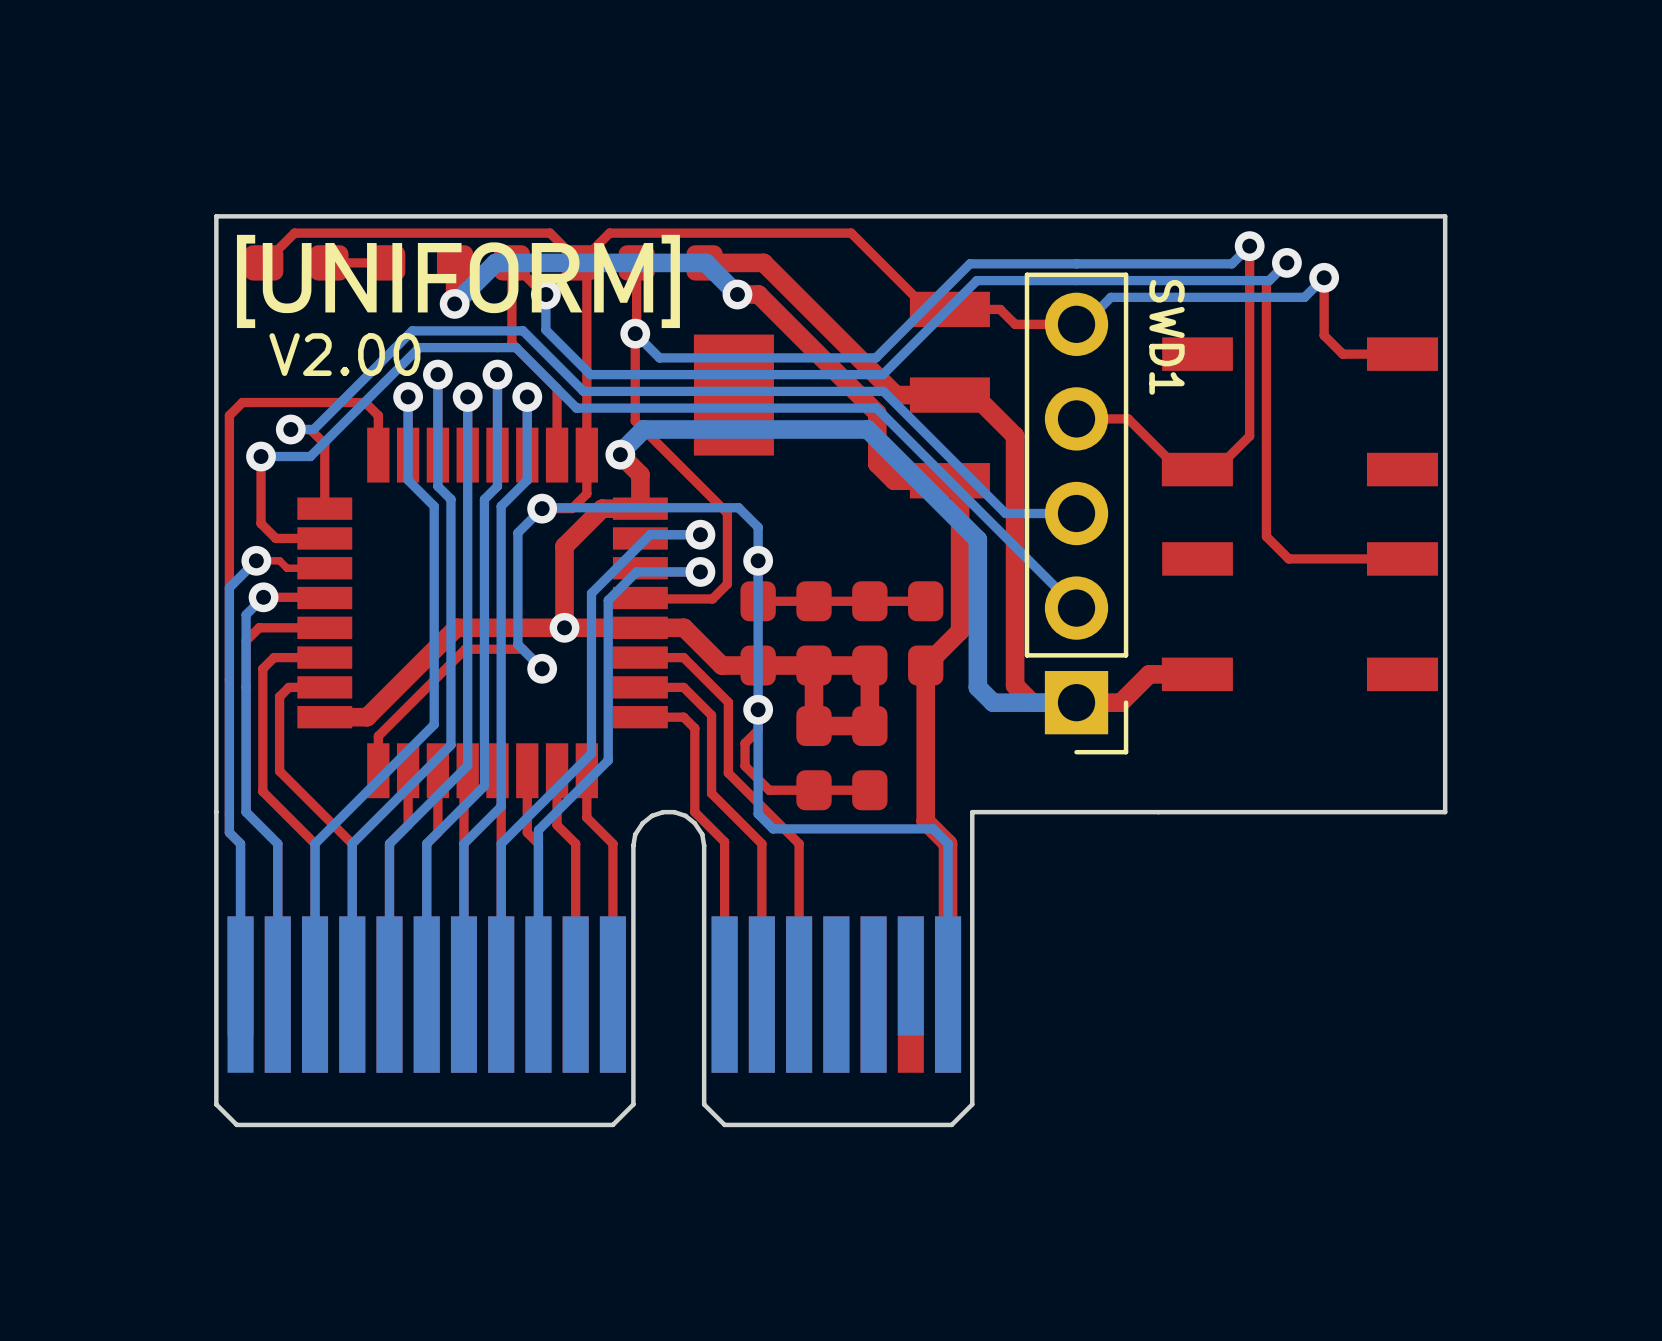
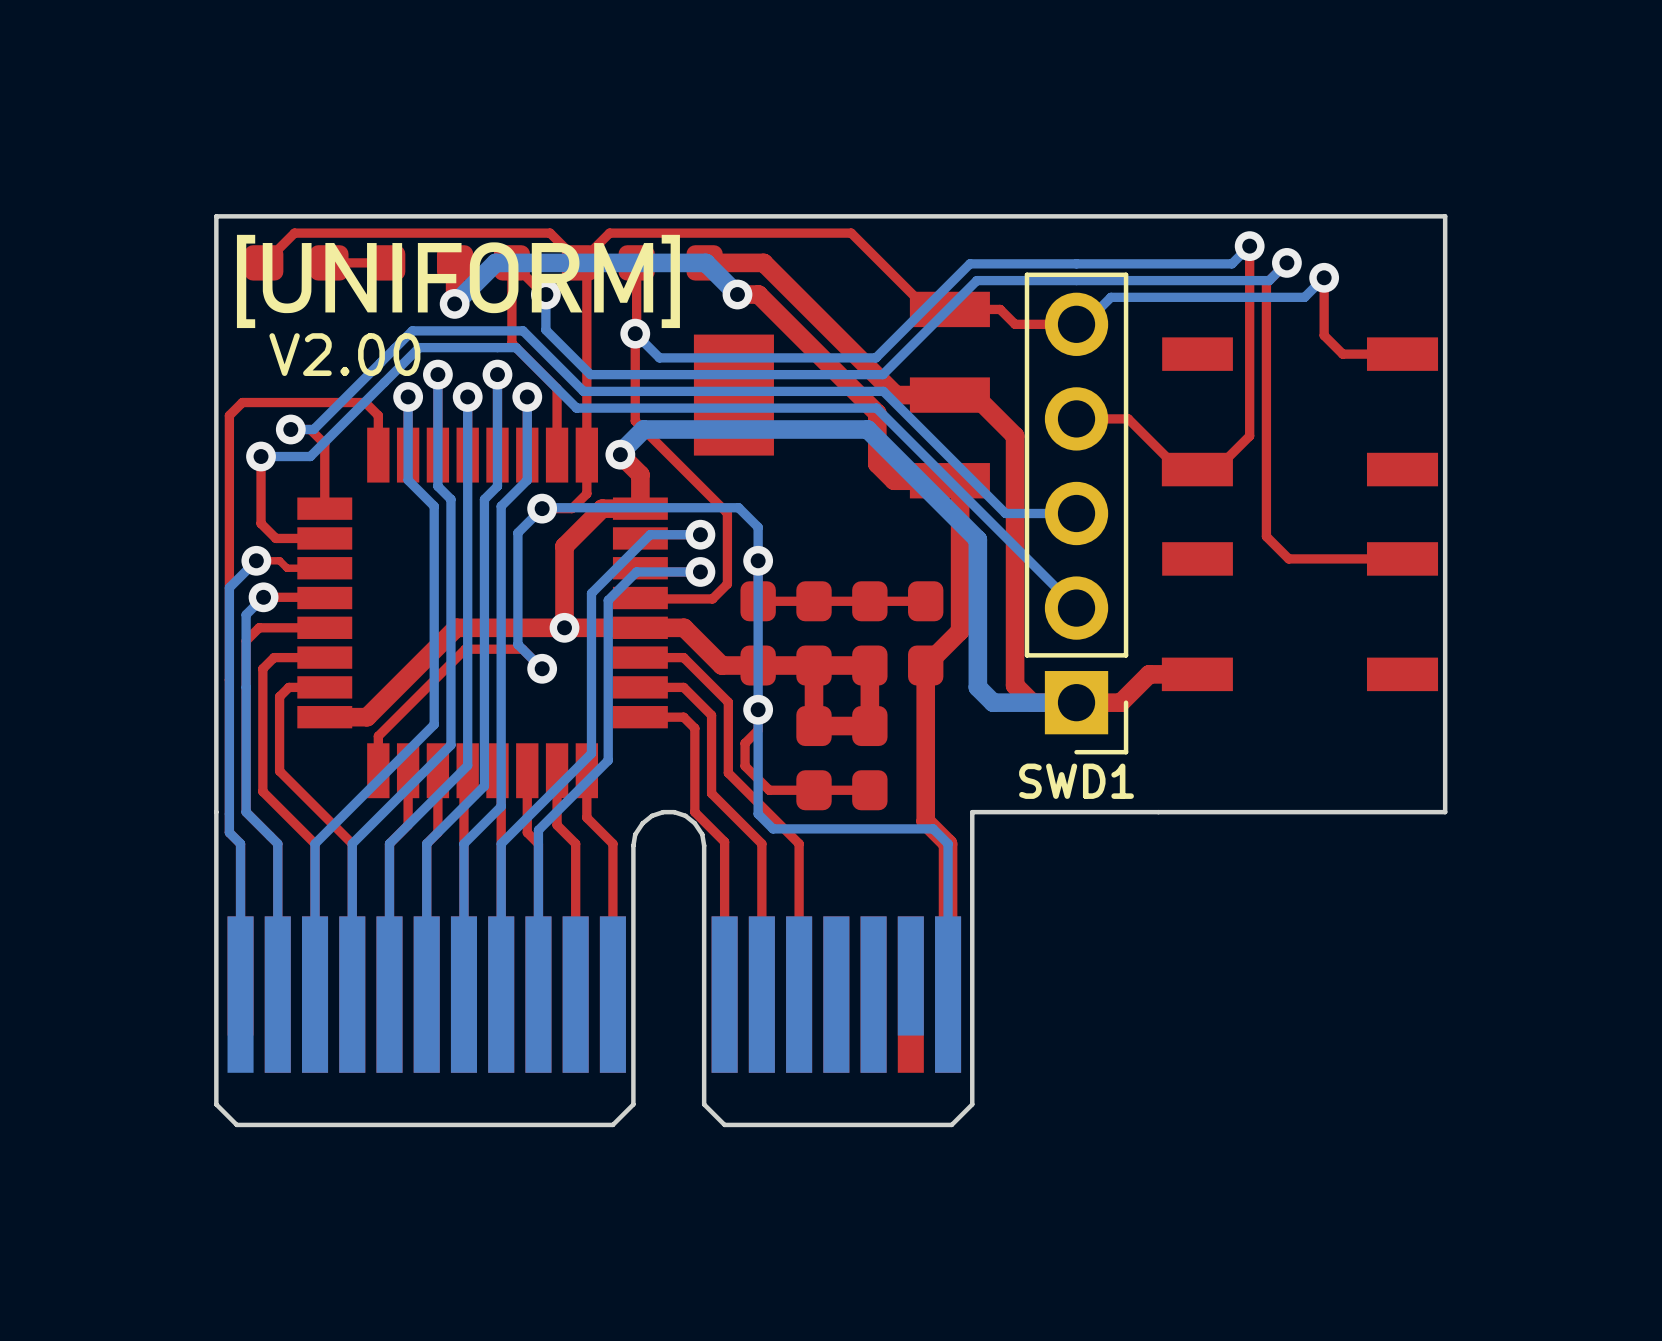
SWD1 name rotation: 0° (1167, 337) -> 90° counterclockwise (1076, 781)
SWD1 name position: SWD1 (1167, 337) -> SWD1 (1076, 781)

